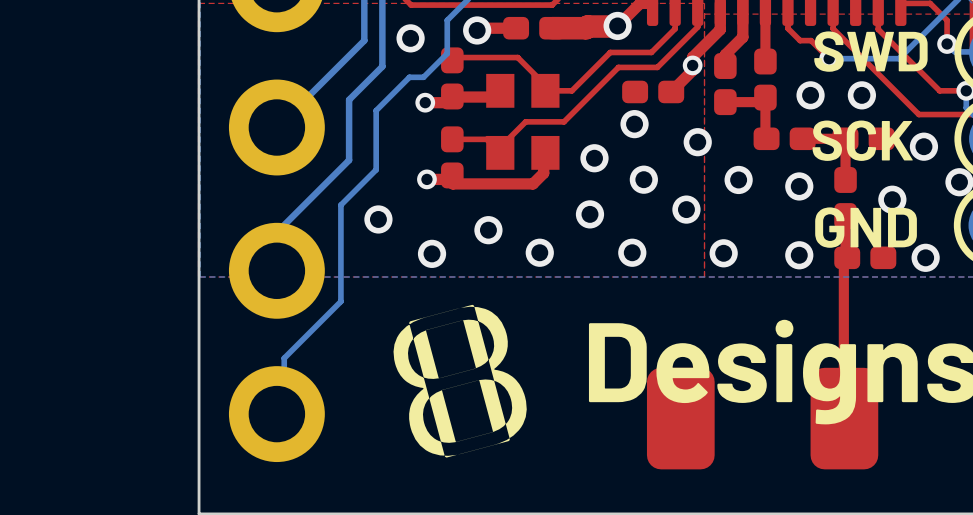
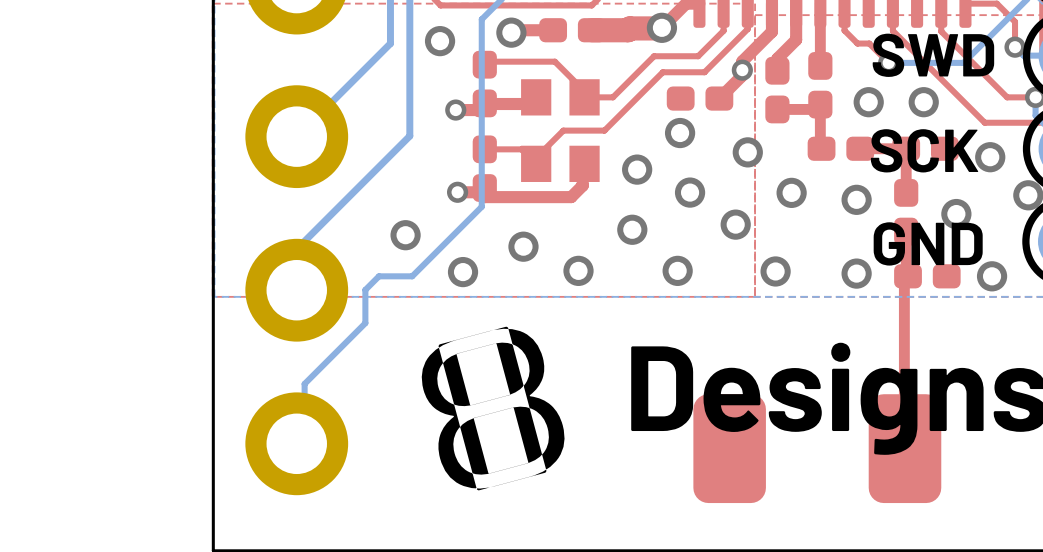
bottom track: (449, 18) (447, 20) (447, 53) (423, 77) (409, 77) (376, 110) (376, 169) (340, 205) (340, 270) -> (481, 19) (481, 206) (412, 276) (378, 276) (365, 289)
bottom track: (382, 66) (349, 99) (349, 160) -> (409, 71) (409, 136) (374, 171)

